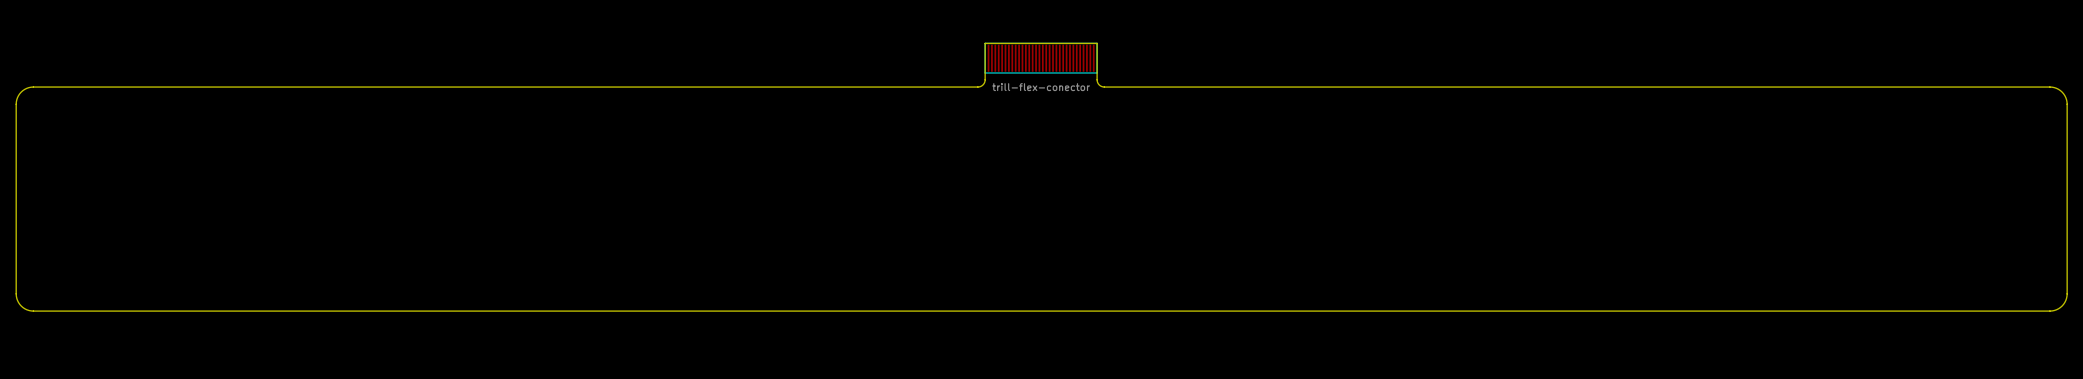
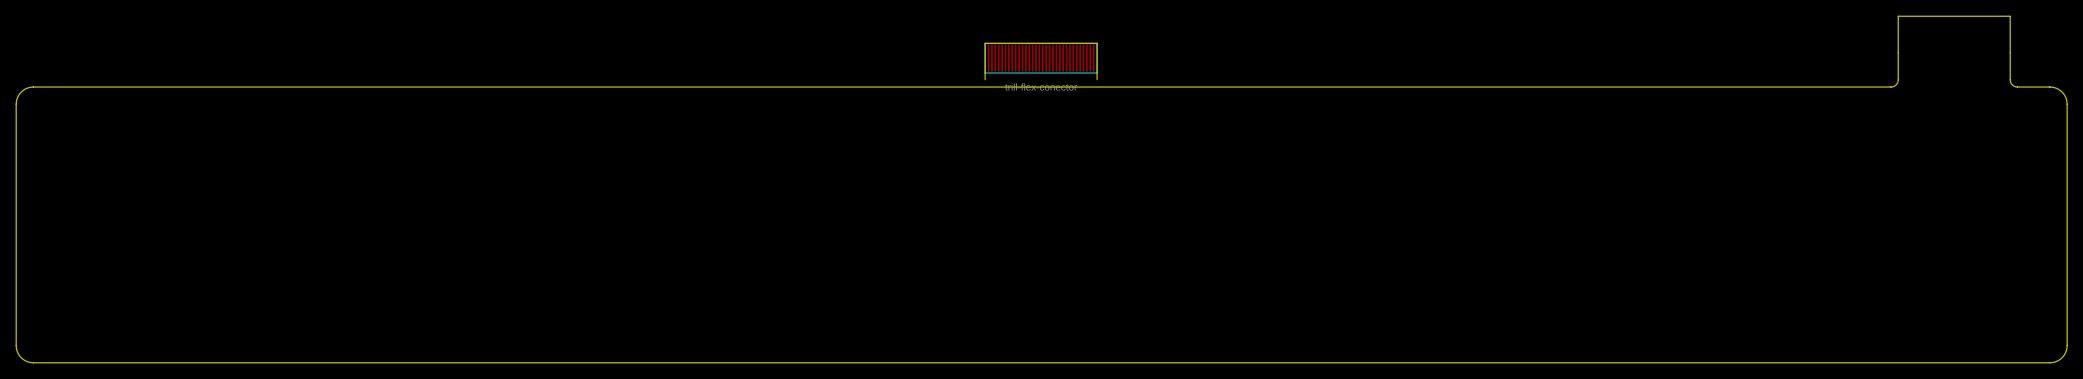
part: none -> (1954, 34)
board edge: none -> (2010, 52) (2010, 81) (2013, 85) (2017, 87)
board edge: (985, 79) (983, 84) (977, 87) -> (1104, 87) (977, 87)
board edge: (1097, 79) (1099, 84) (1104, 87) -> none
board edge: (1891, 87) (2017, 87) -> (1891, 87) (1895, 85) (1898, 81) (1898, 52)
board edge: (16, 293) (21, 306) (33, 311) (2049, 311) (2062, 306) (2067, 293) -> (16, 293) (16, 350) (22, 359) (33, 362) (2049, 362) (2060, 359) (2066, 350) (2067, 293)

